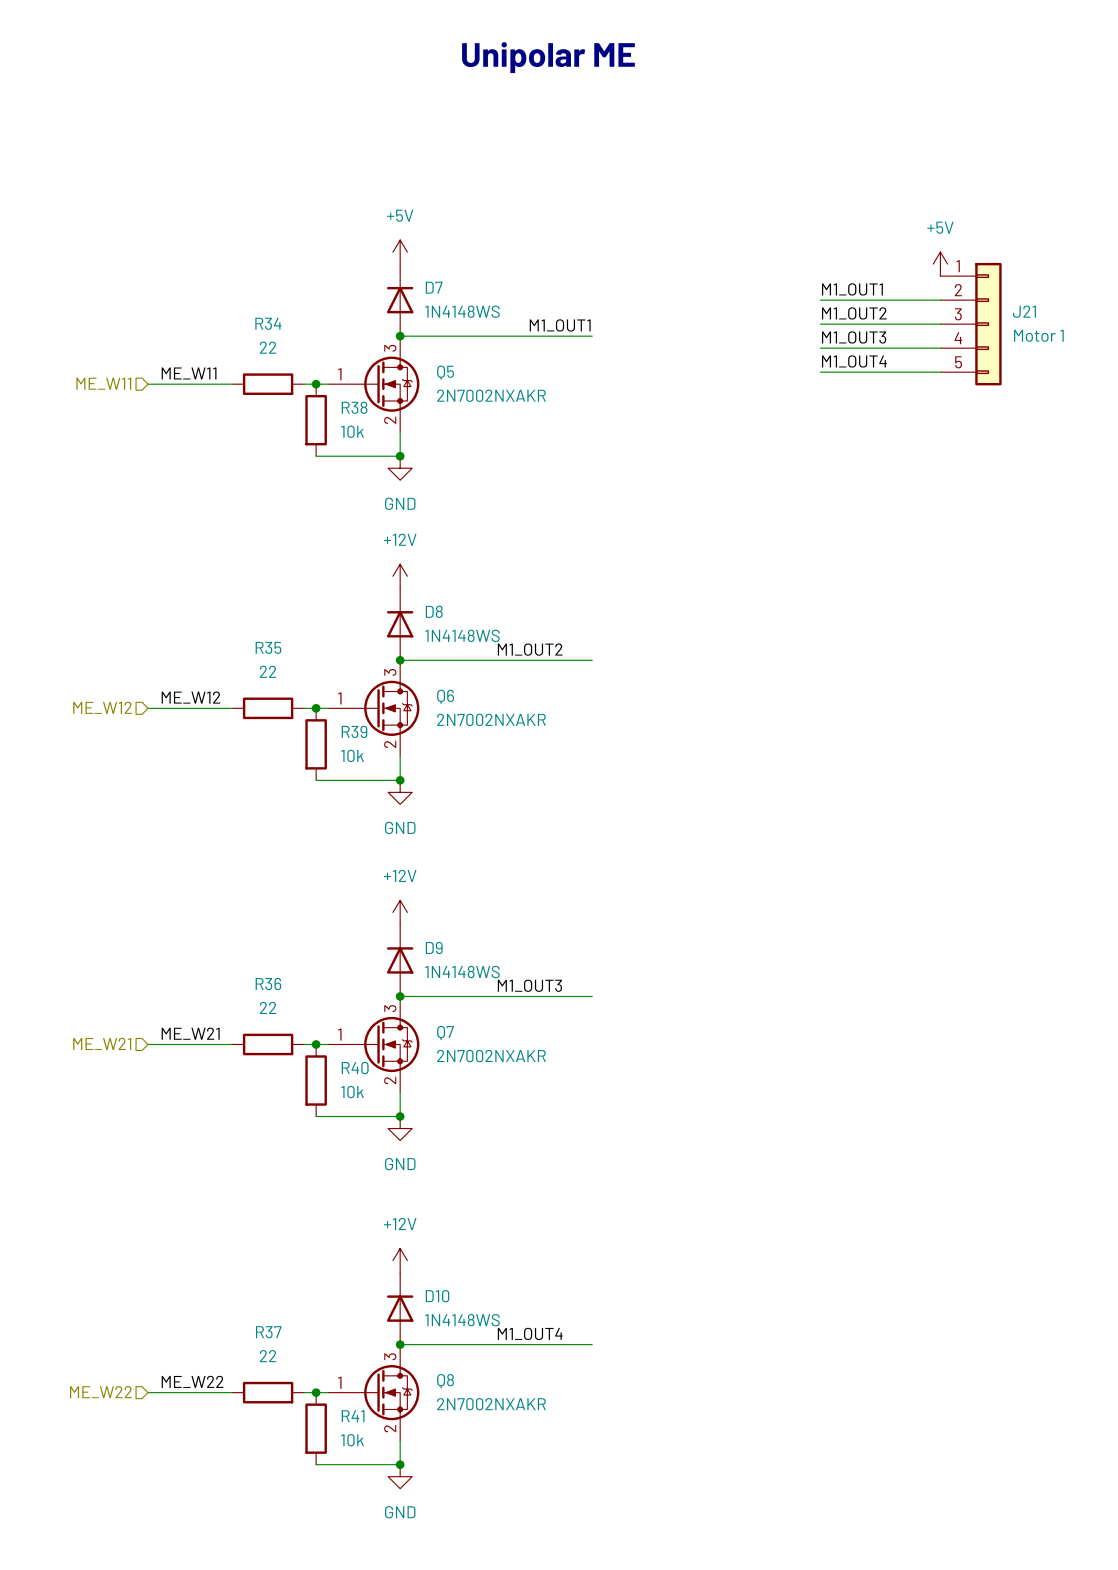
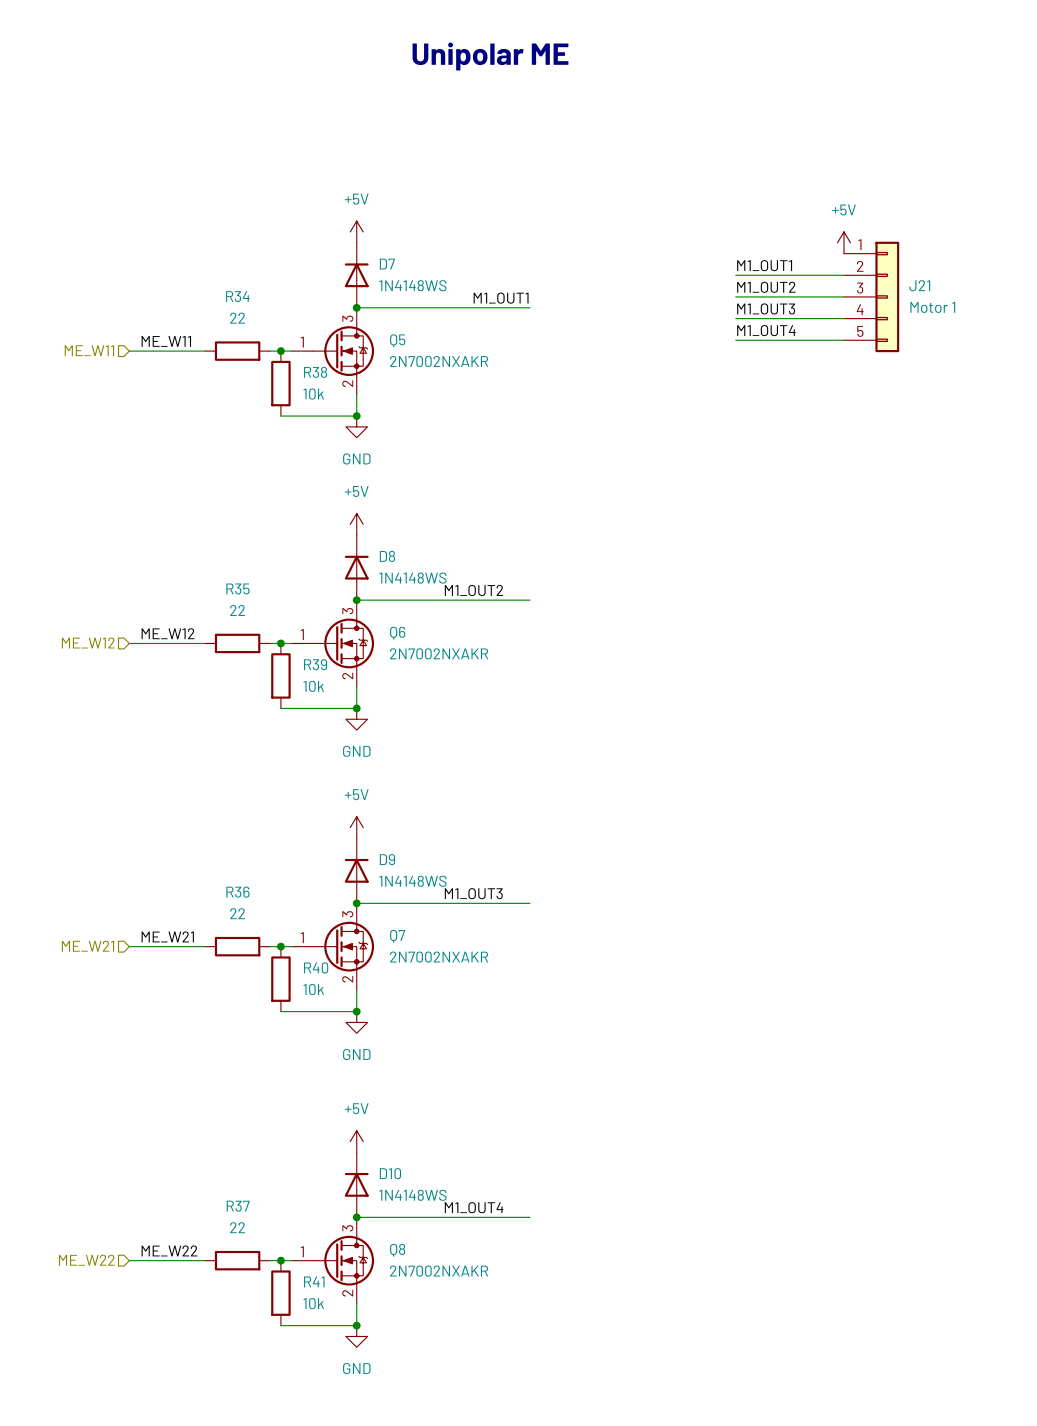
power symbol: +12V (400, 576) -> +5V (356, 524)
power symbol: +12V (400, 912) -> +5V (356, 827)
power symbol: +12V (400, 1260) -> +5V (356, 1141)

